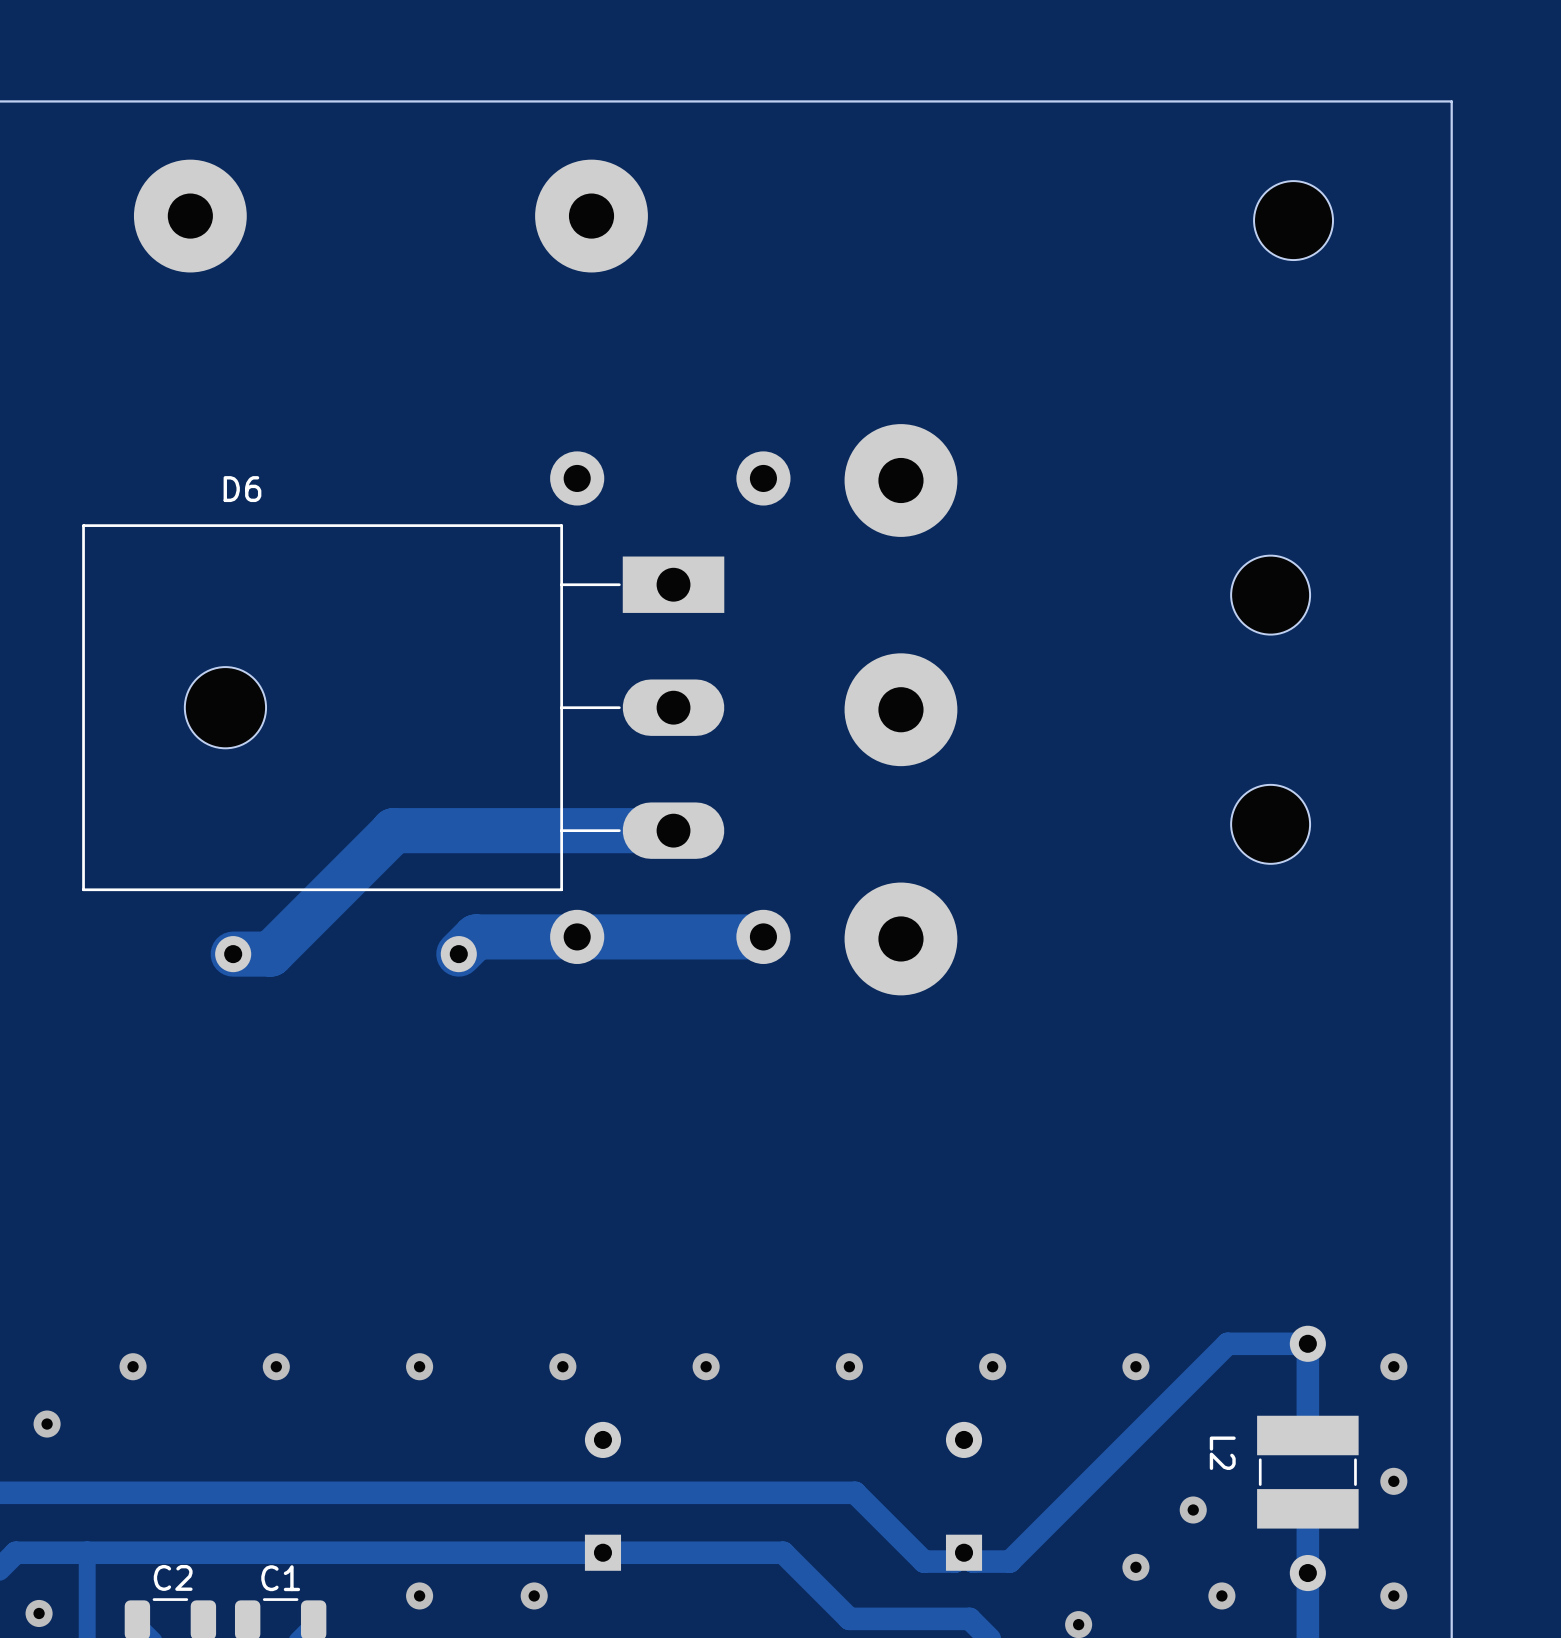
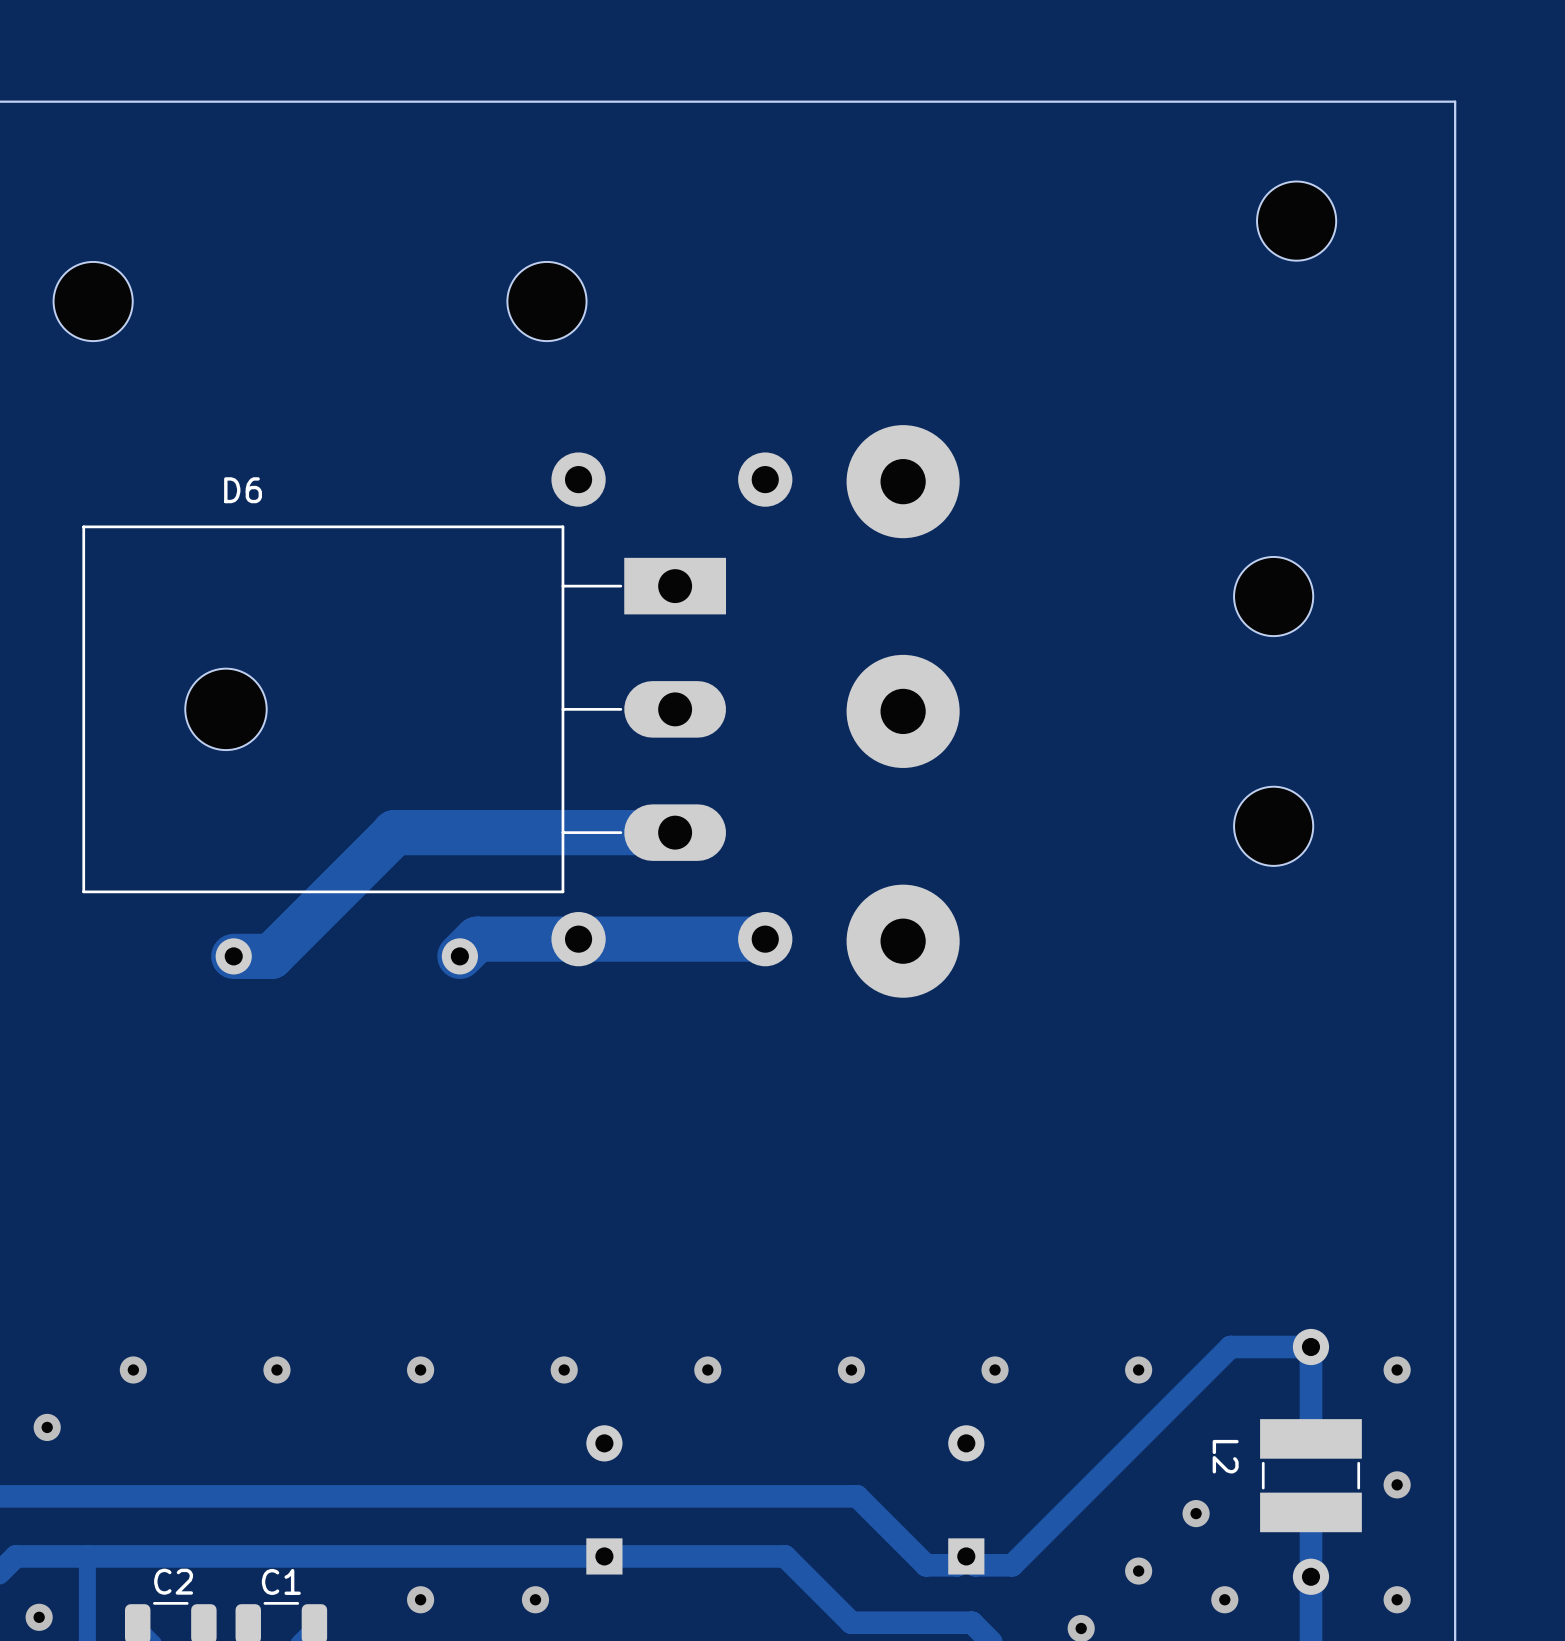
part: (190, 216) -> none
part: (591, 216) -> none
part: none -> (93, 301)
part: none -> (546, 301)

